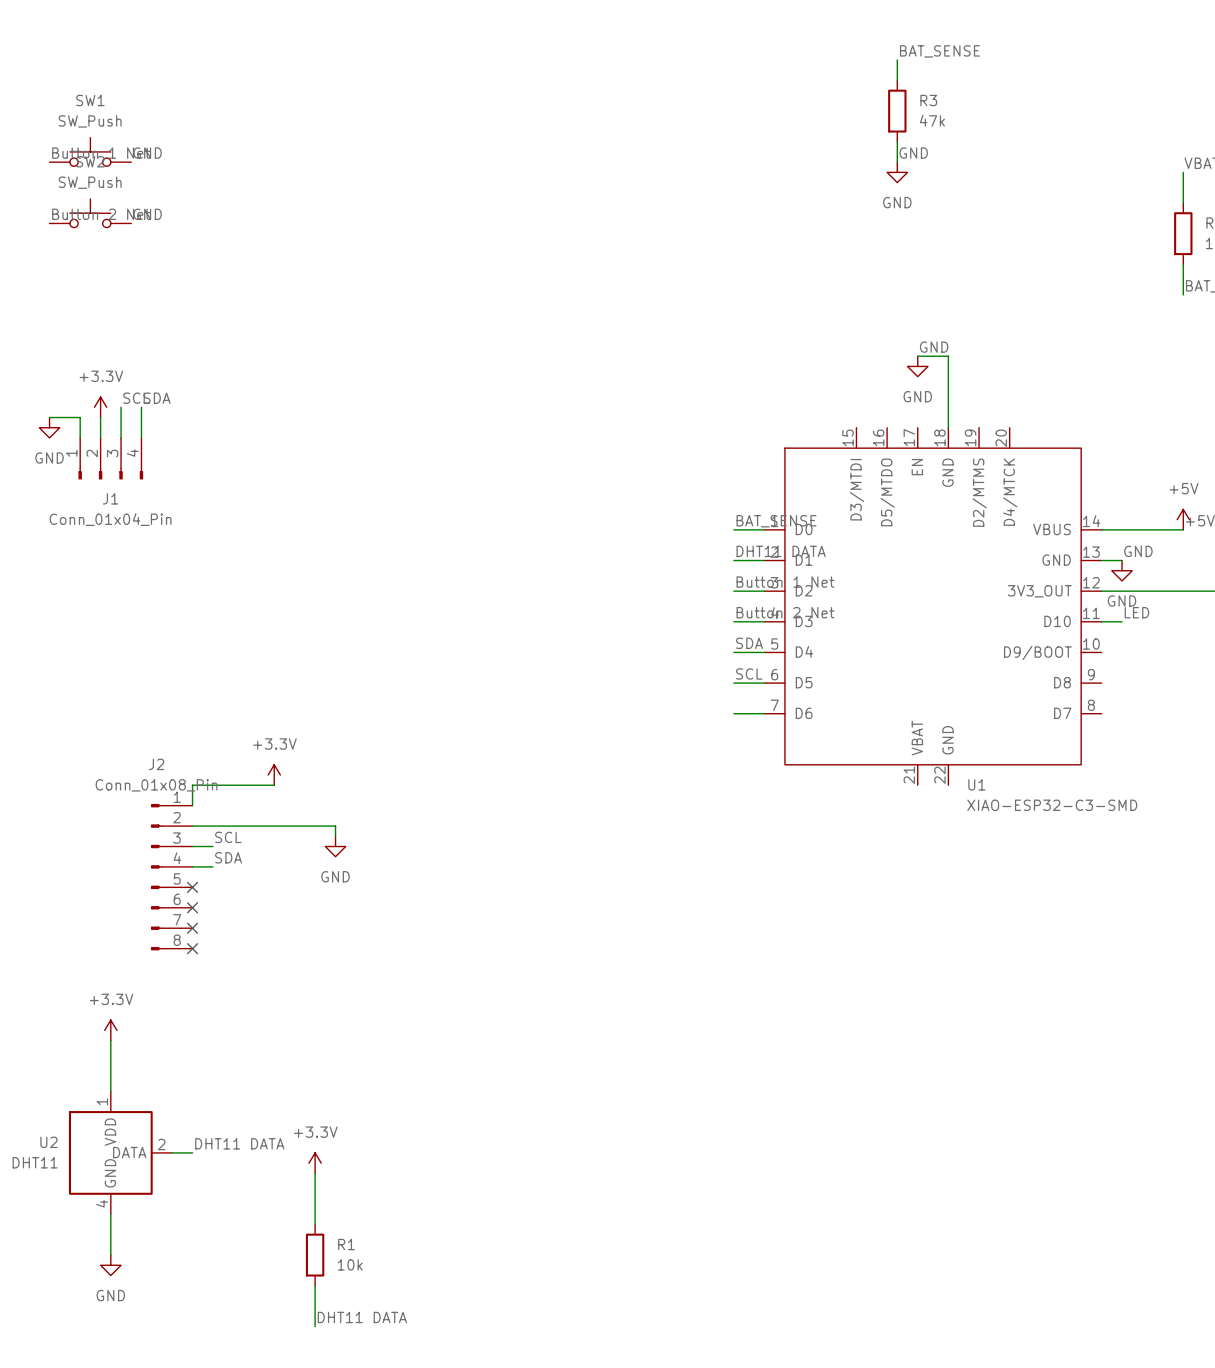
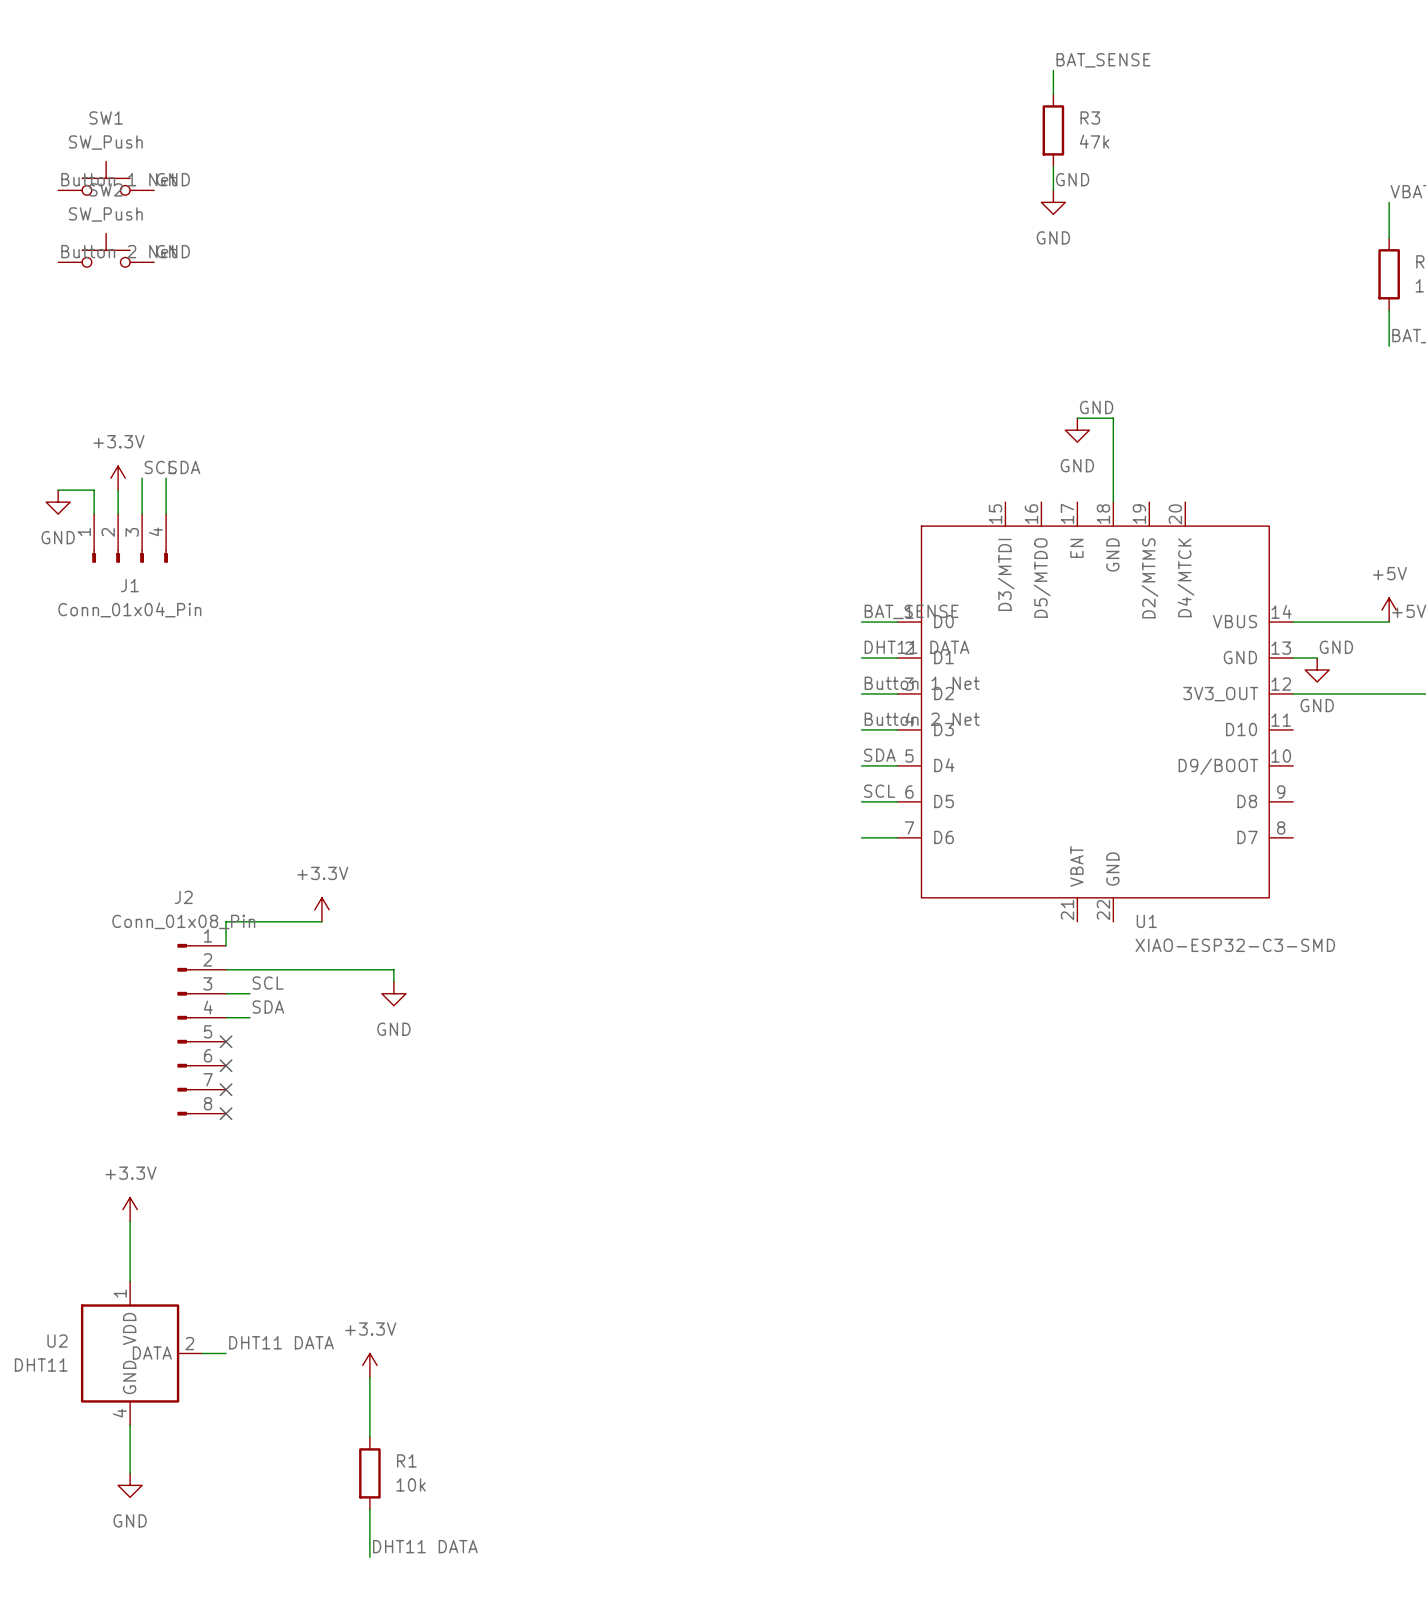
label: LED (1136, 612) -> none
wire: (1101, 621) (1122, 621) -> none

